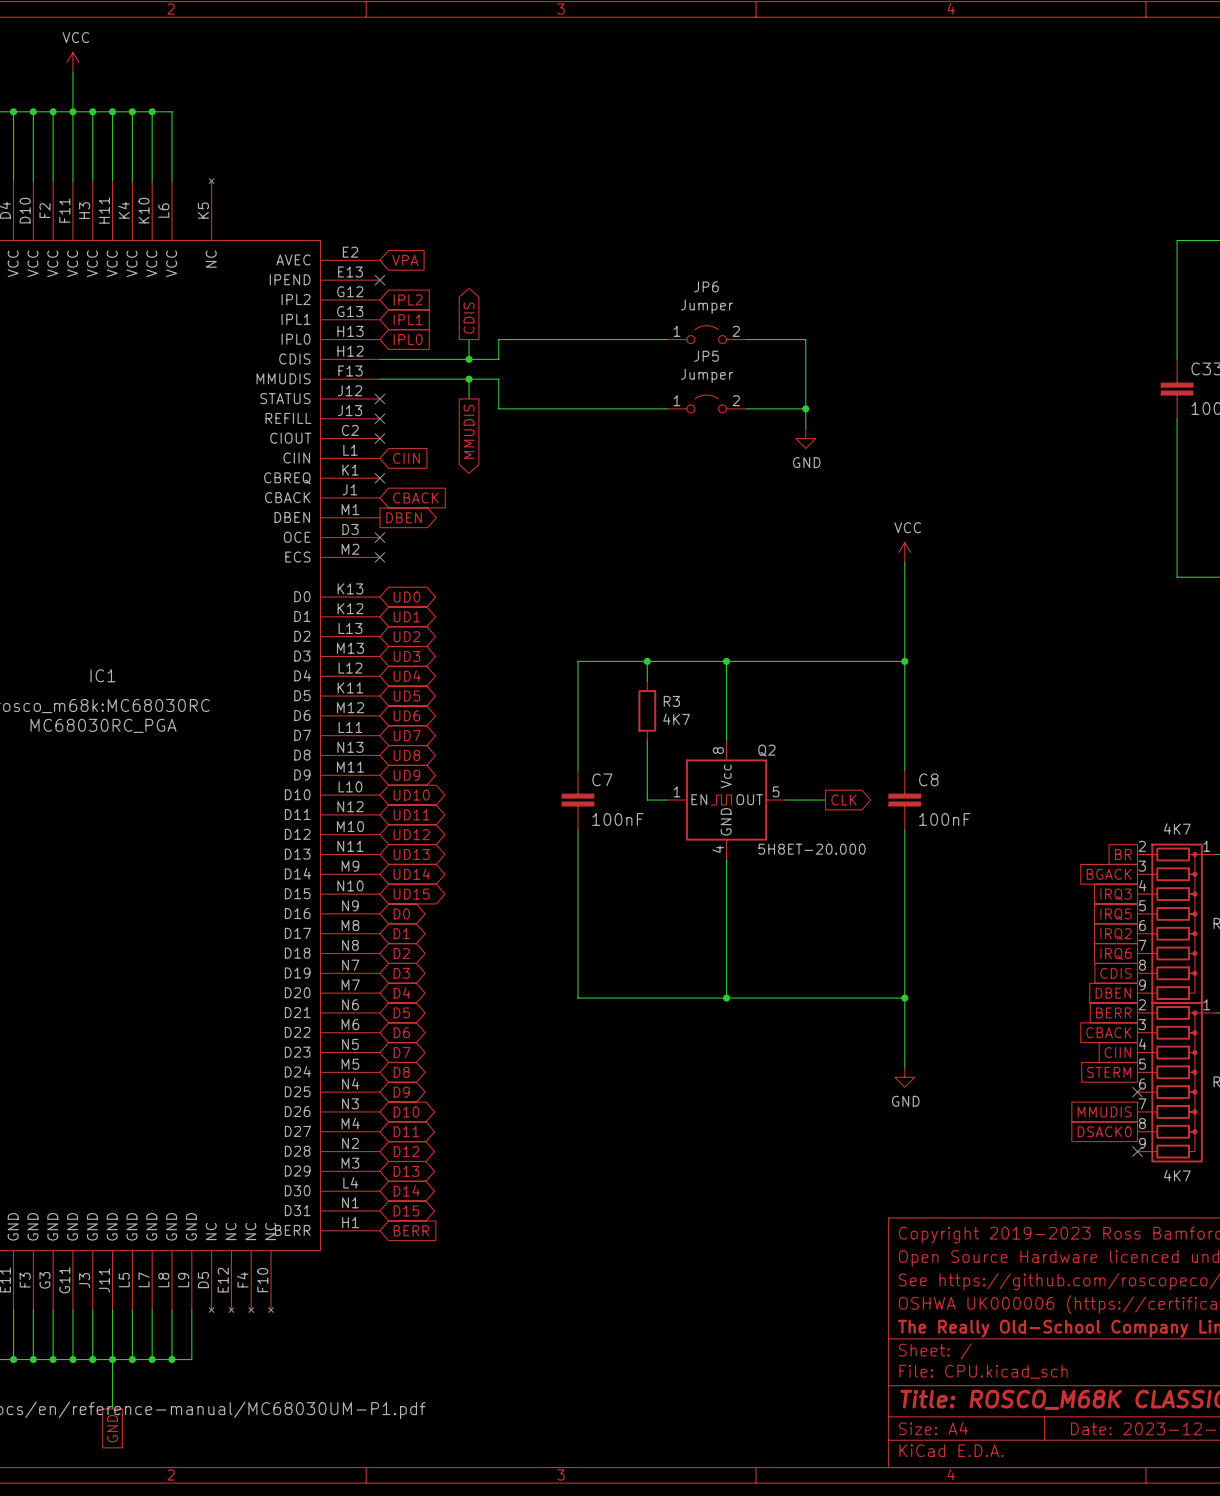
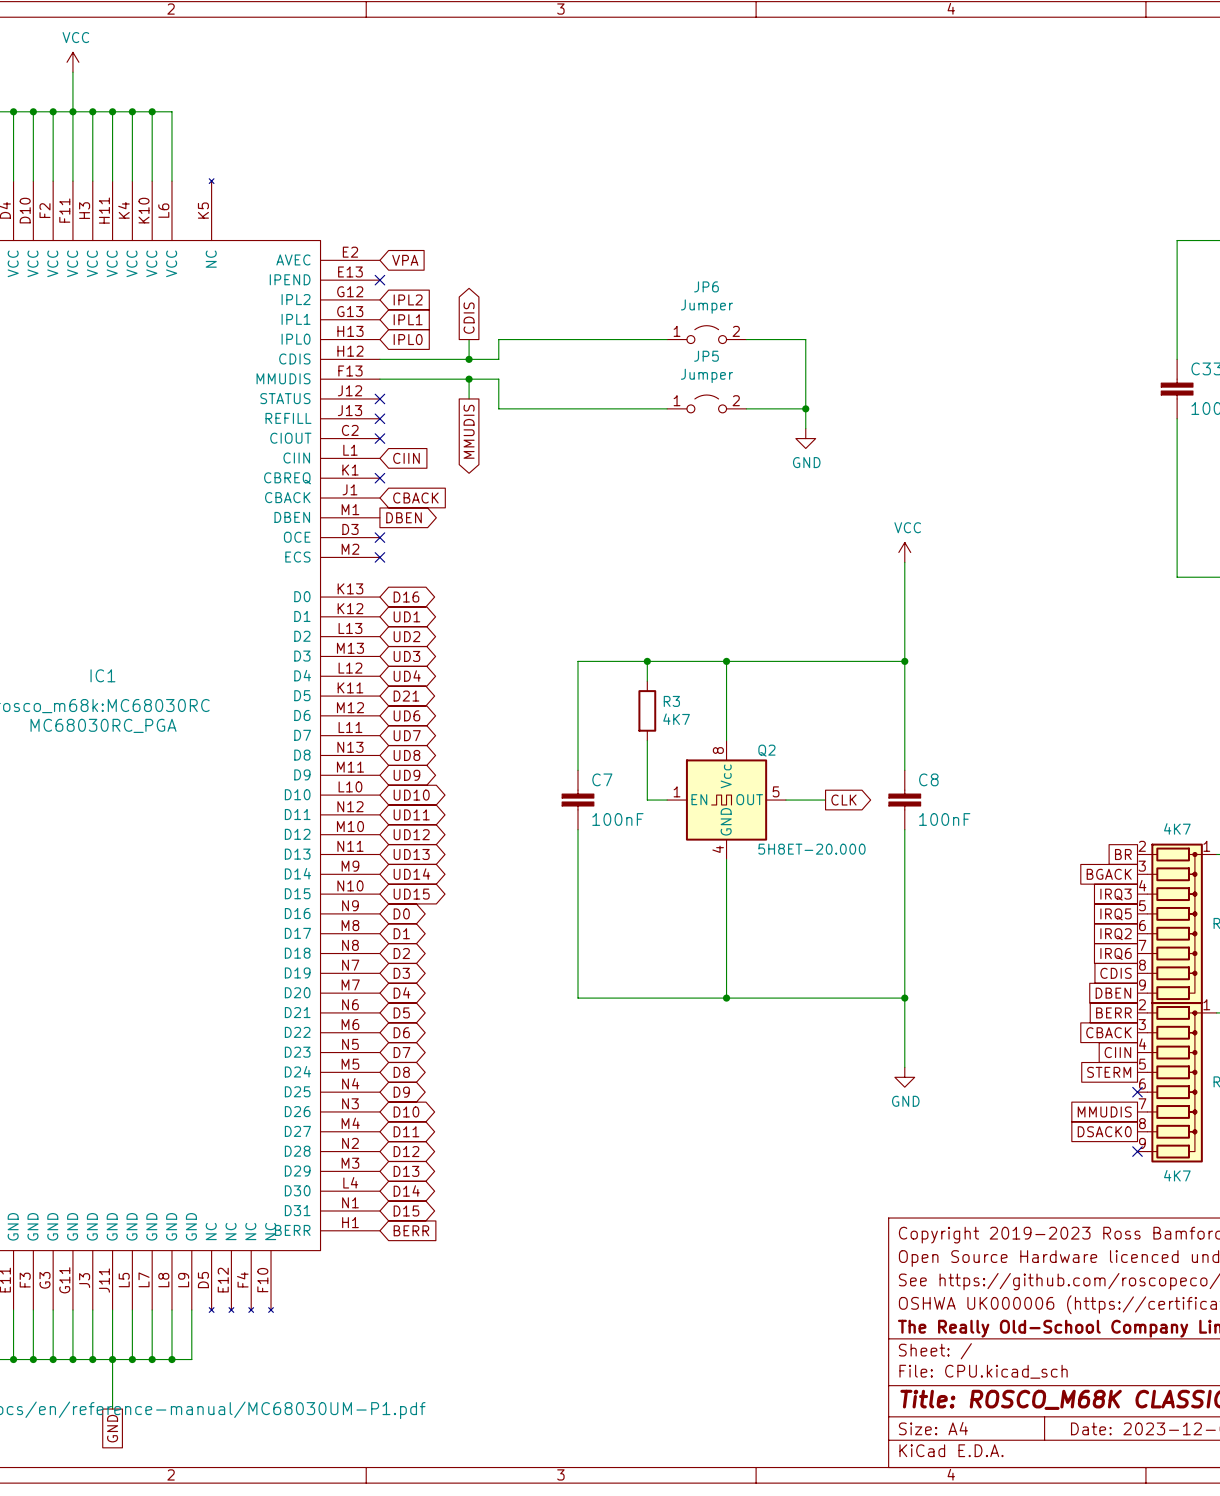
global label: UD0 (406, 597) -> D16 (406, 597)
global label: UD5 (406, 696) -> D21 (406, 696)

